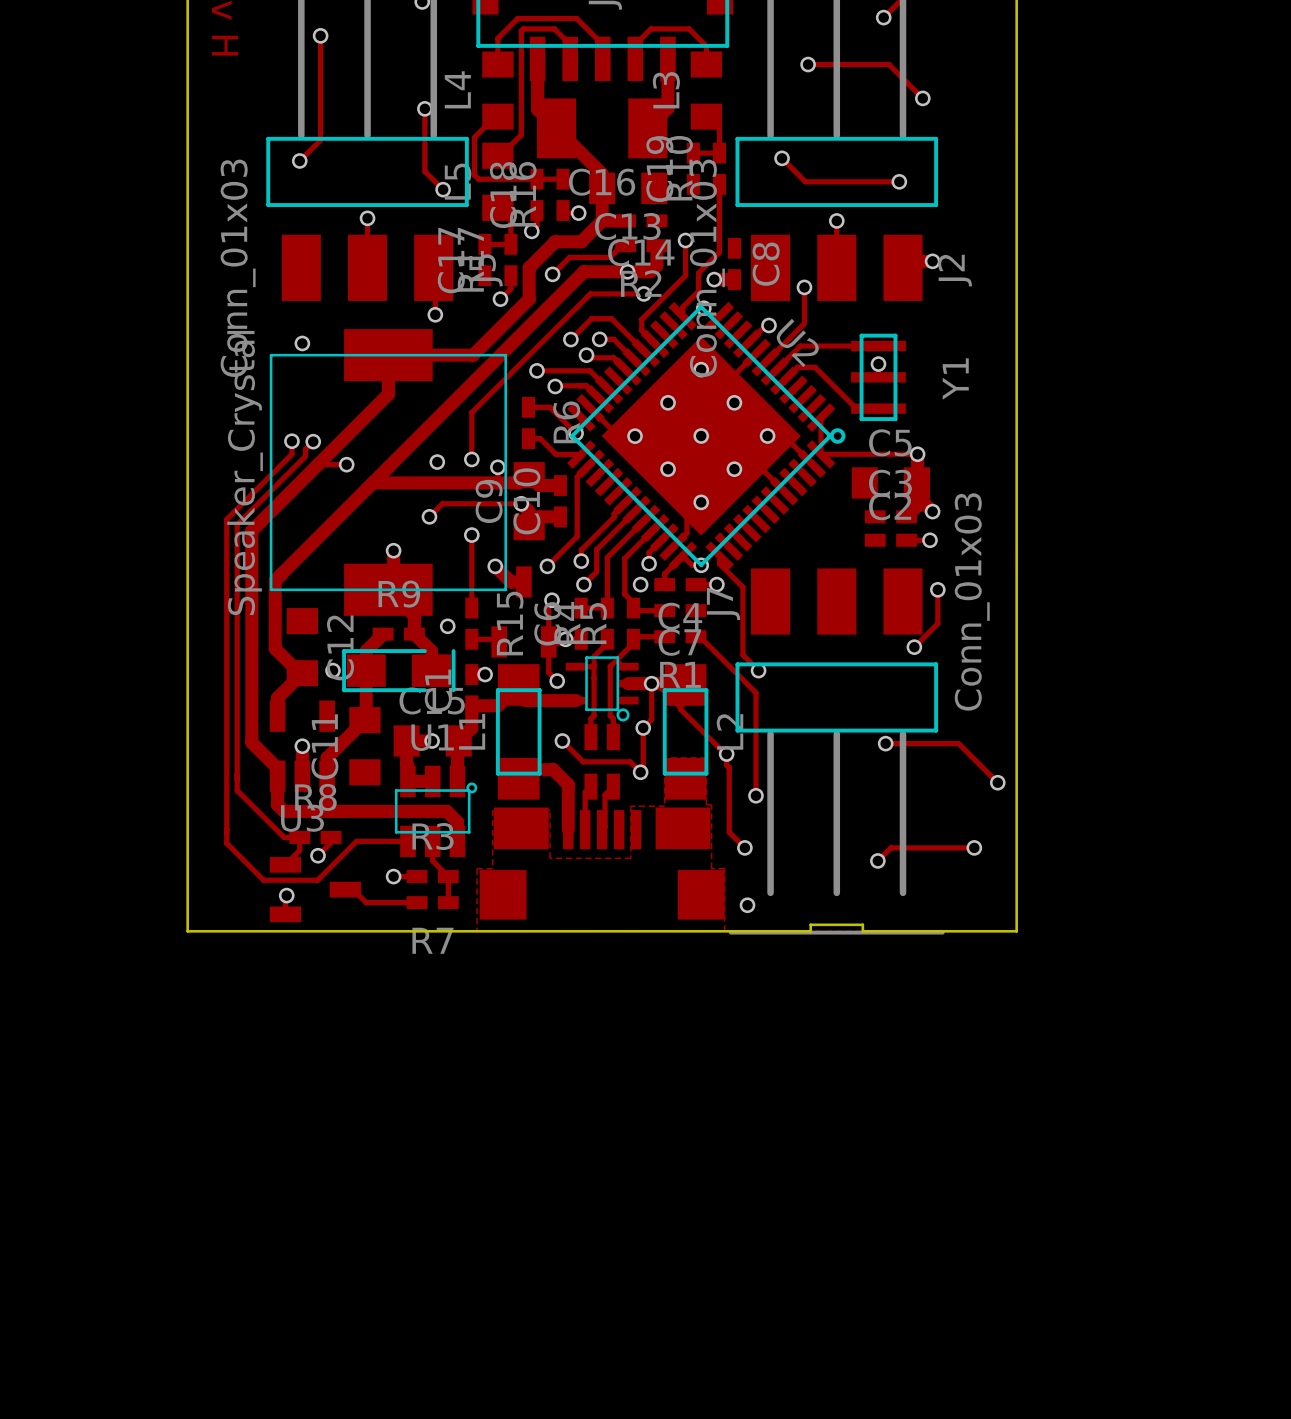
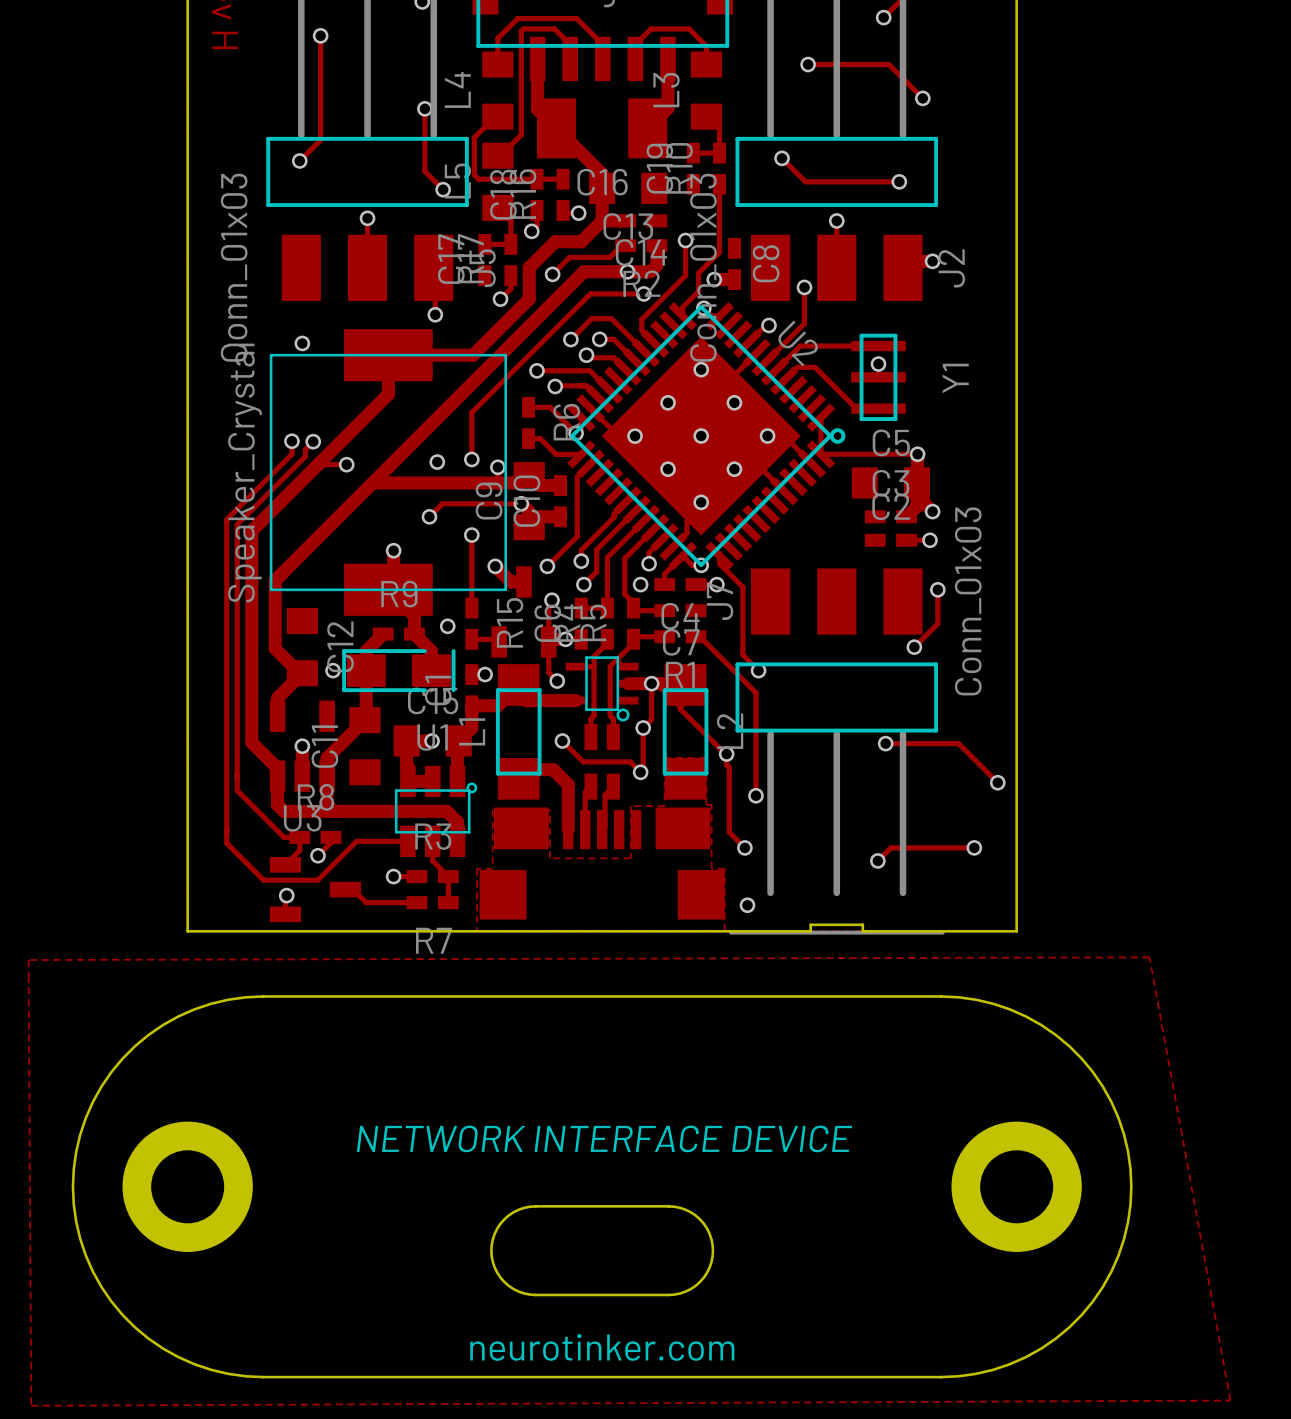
zone outline: none -> (1149, 957) (1230, 1400) (31, 1405) (28, 959) (1149, 957)
board edge: none -> (263, 996) (941, 996) (976, 999) (993, 1003) (1025, 1016) (1055, 1034) (1081, 1058) (1102, 1086) (1118, 1118) (1128, 1151) (1131, 1186) (1128, 1221) (1124, 1238) (1118, 1255) (1102, 1286) (1081, 1315) (1069, 1327) (1055, 1338) (1025, 1357) (1009, 1364) (976, 1373) (941, 1377) (263, 1377) (228, 1373) (211, 1369) (178, 1357) (148, 1338) (122, 1315) (101, 1286) (85, 1255) (76, 1221) (72, 1186) (76, 1151) (85, 1118) (101, 1086) (122, 1058) (148, 1034) (163, 1024) (194, 1009) (228, 999) (263, 996)
text: none -> NETWORK INTERFACE DEVICE (604, 1138)
part: none -> (187, 1186)
part: none -> (1016, 1186)
board edge: none -> (535, 1206) (680, 1207) (695, 1215) (707, 1228) (712, 1244) (711, 1262) (703, 1277) (695, 1285) (685, 1291) (674, 1294) (524, 1293) (508, 1285) (497, 1272) (492, 1262) (491, 1244) (497, 1228) (508, 1215) (524, 1207) (535, 1206)
text: none -> neurotinker.com (602, 1347)

